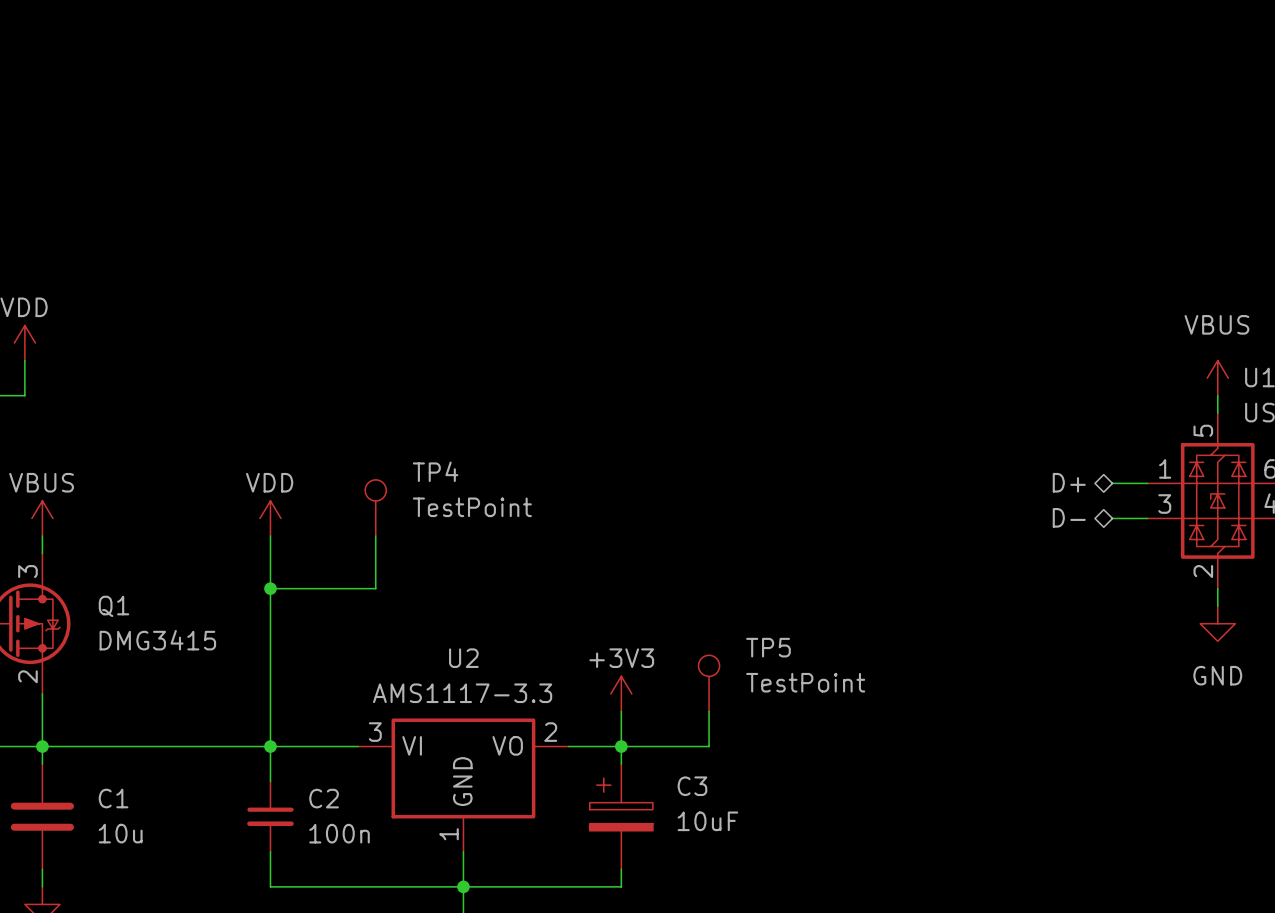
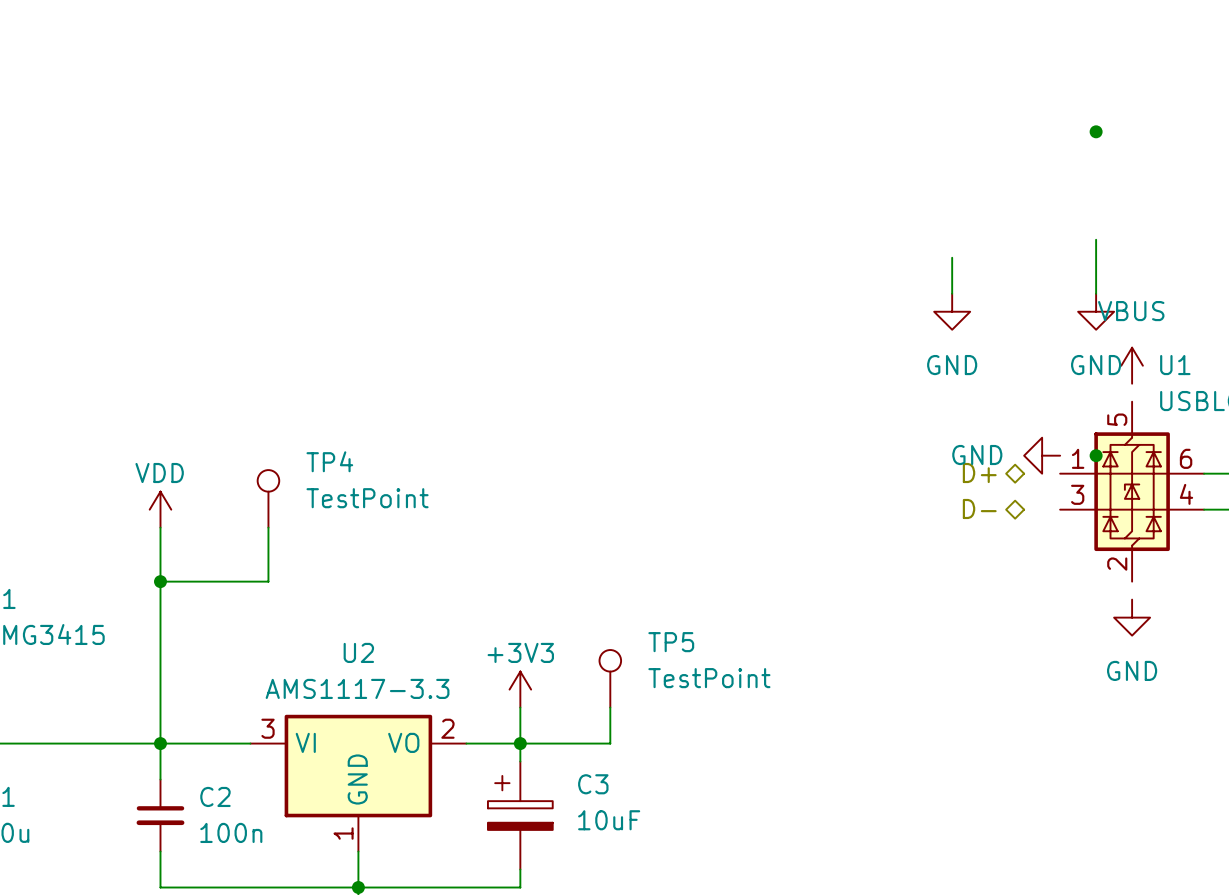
junction: none -> (1096, 131)
wire: none -> (1096, 239) (1096, 293)
wire: none -> (952, 257) (952, 293)
power symbol: none -> GND (952, 311)
power symbol: none -> GND (1096, 311)
wire: (1217, 395) (1217, 413) -> none
power symbol: none -> GND (1042, 455)
junction: none -> (1096, 455)
wire: (1112, 483) (1147, 483) -> none
wire: (1112, 518) (1147, 518) -> none
wire: (1217, 588) (1217, 606) -> none

